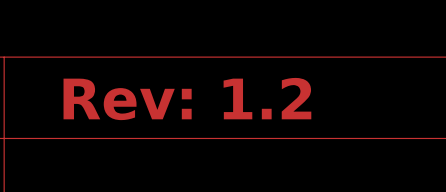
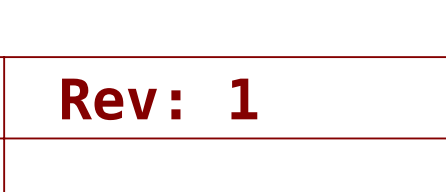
title block: Rev: 1.2 (187, 99) -> Rev: 1 (159, 99)

